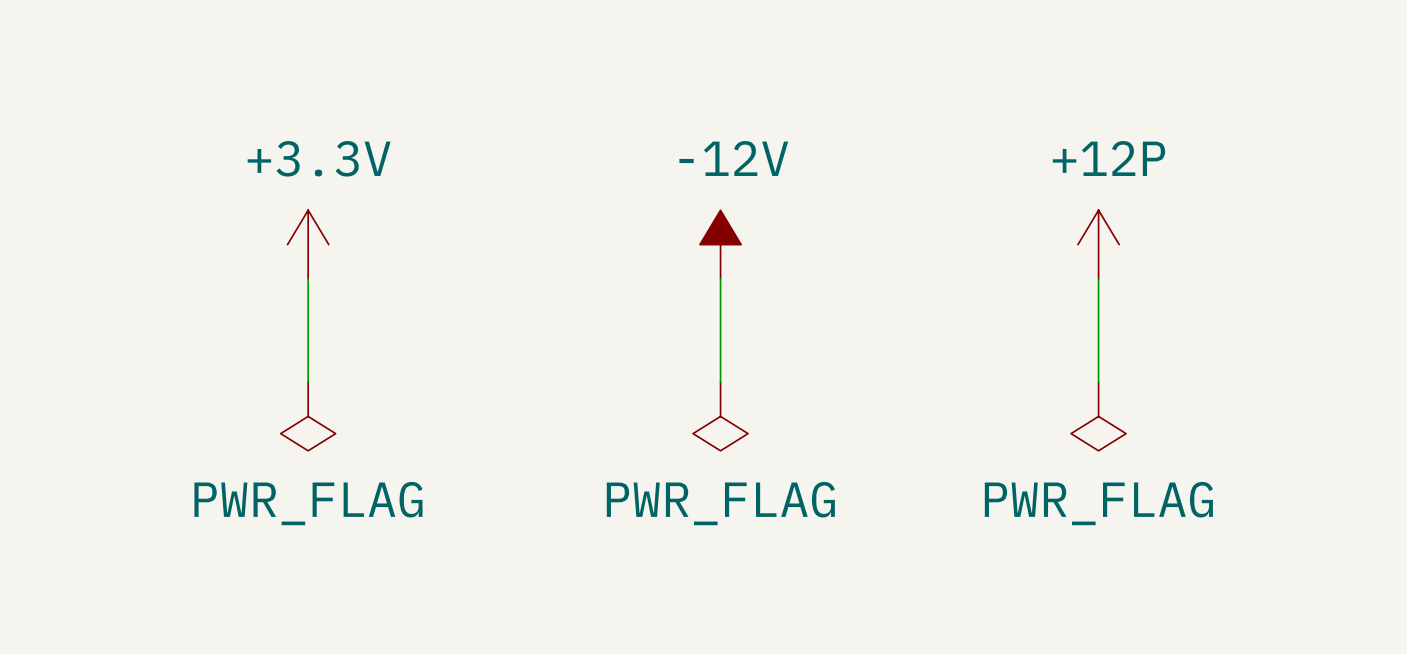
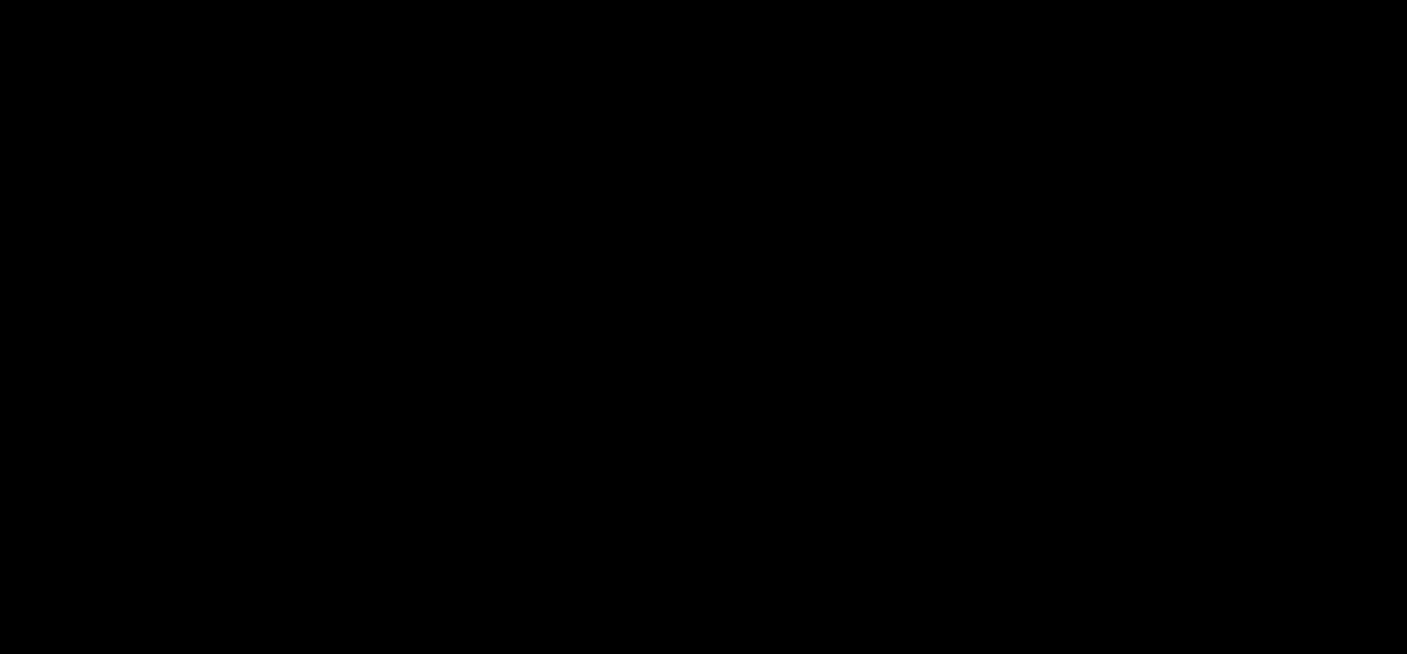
power symbol: +3.3V (308, 244) -> none
power symbol: -12V (720, 244) -> none
power symbol: +12P (1098, 244) -> none
wire: (308, 278) (308, 382) -> none
wire: (720, 278) (720, 382) -> none
wire: (1098, 278) (1098, 382) -> none
power symbol: PWR_FLAG (308, 416) -> none
power symbol: PWR_FLAG (720, 416) -> none
power symbol: PWR_FLAG (1098, 416) -> none

